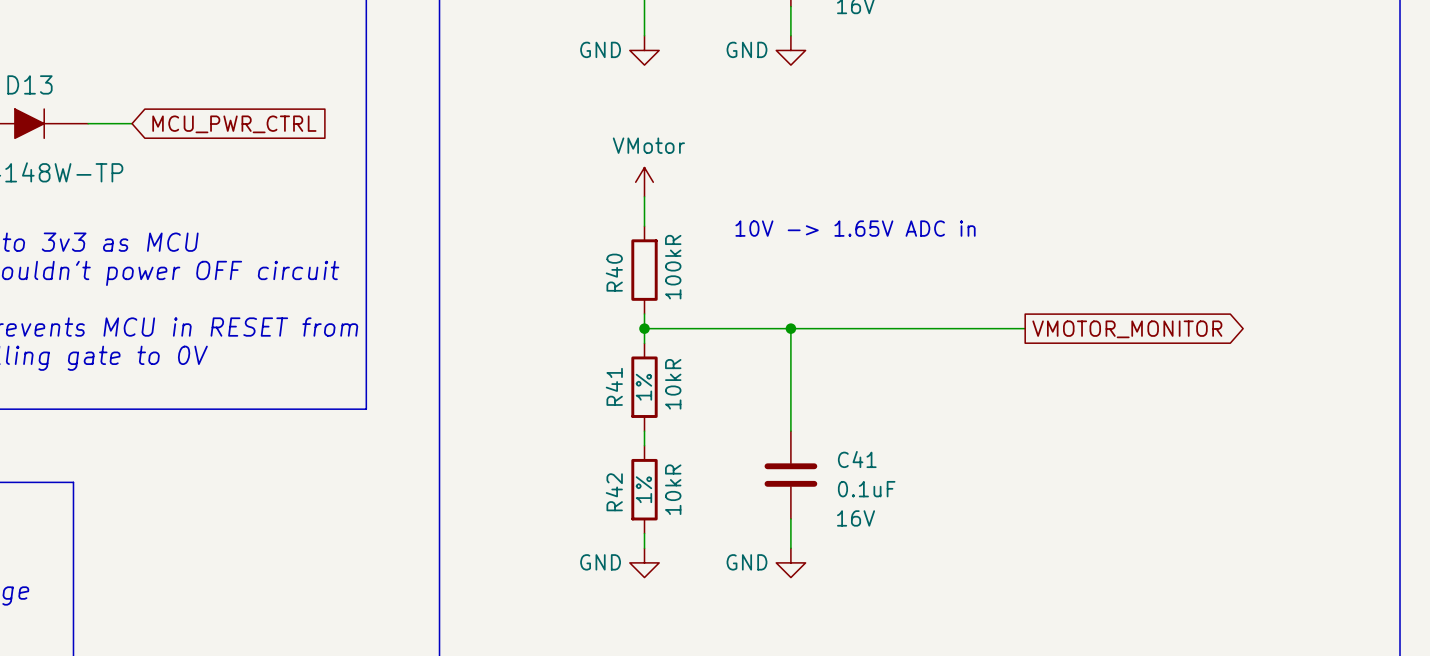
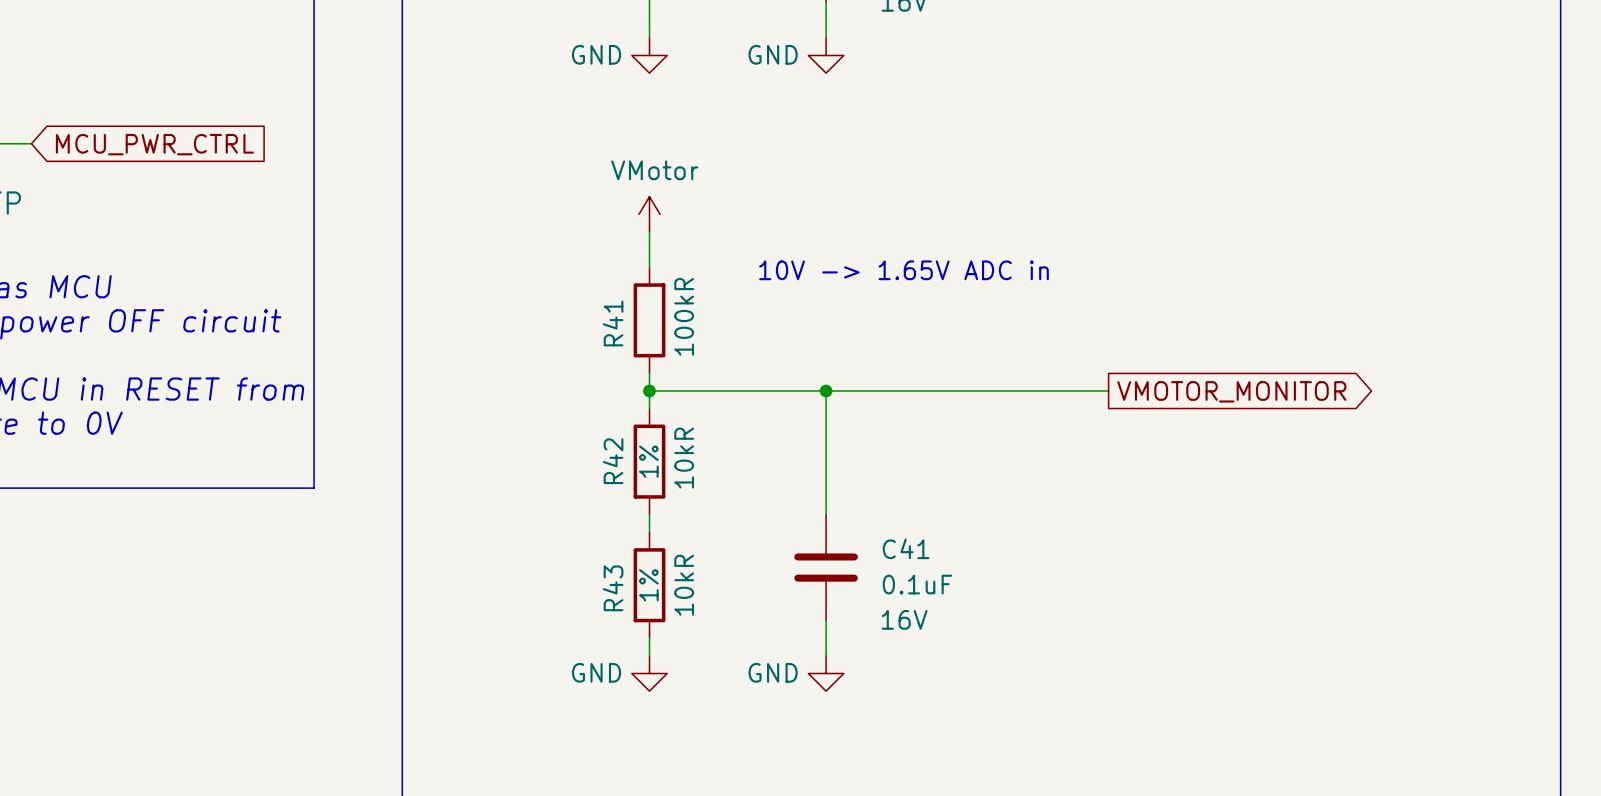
R40 name: R40 (614, 272) -> R41 (613, 323)
R41 name: R41 (614, 386) -> R42 (613, 461)
R42 name: R42 (614, 492) -> R43 (613, 588)

